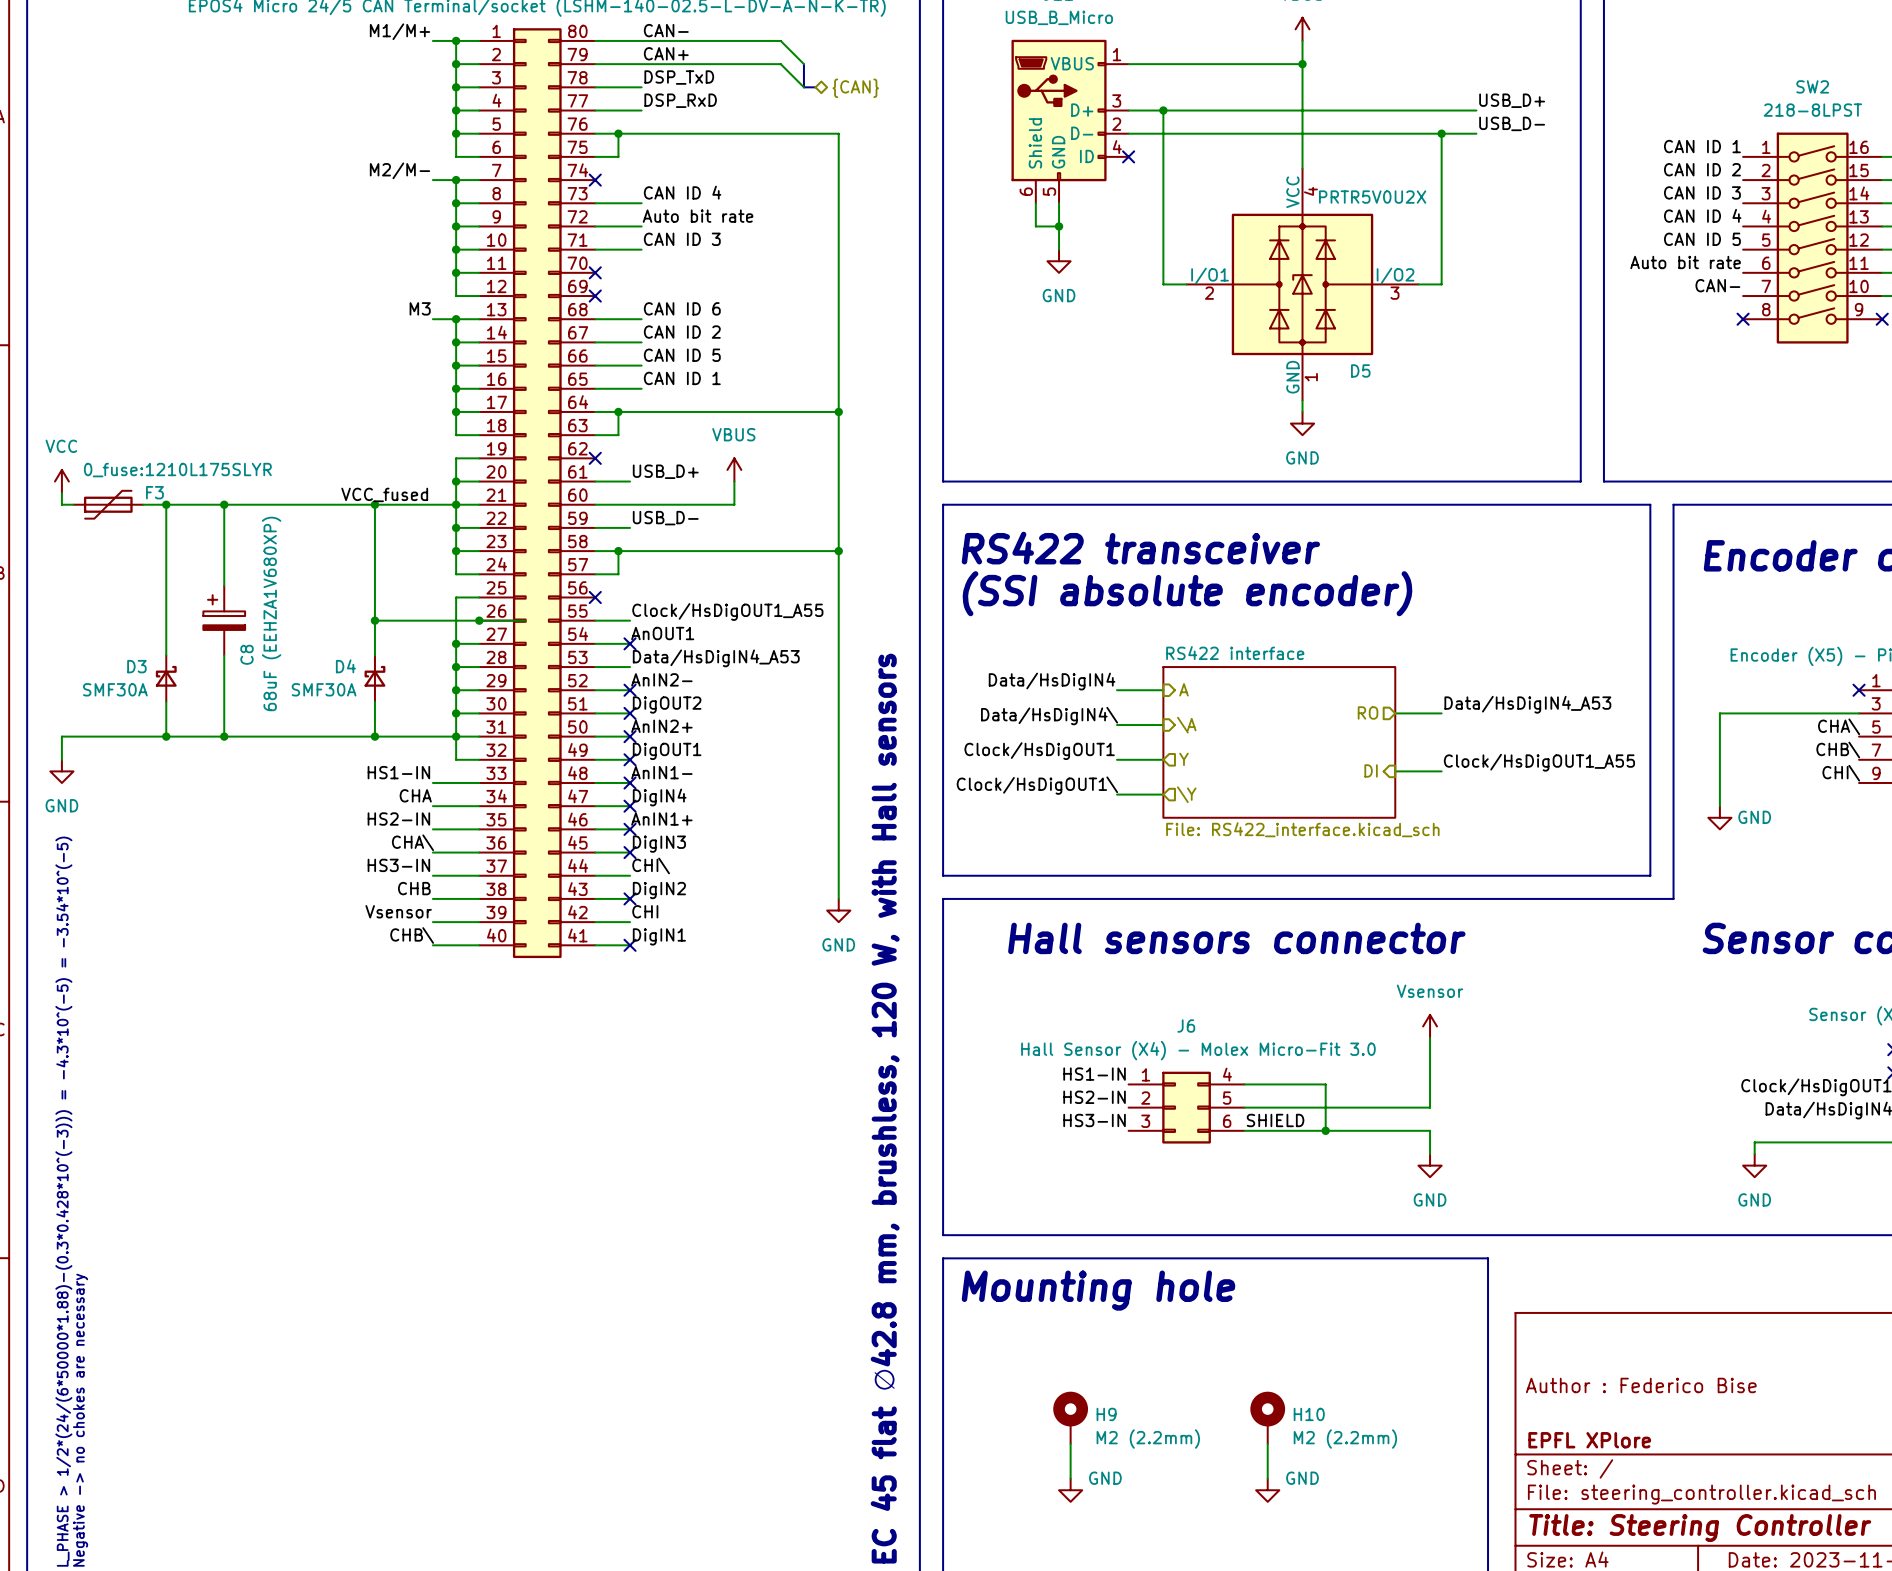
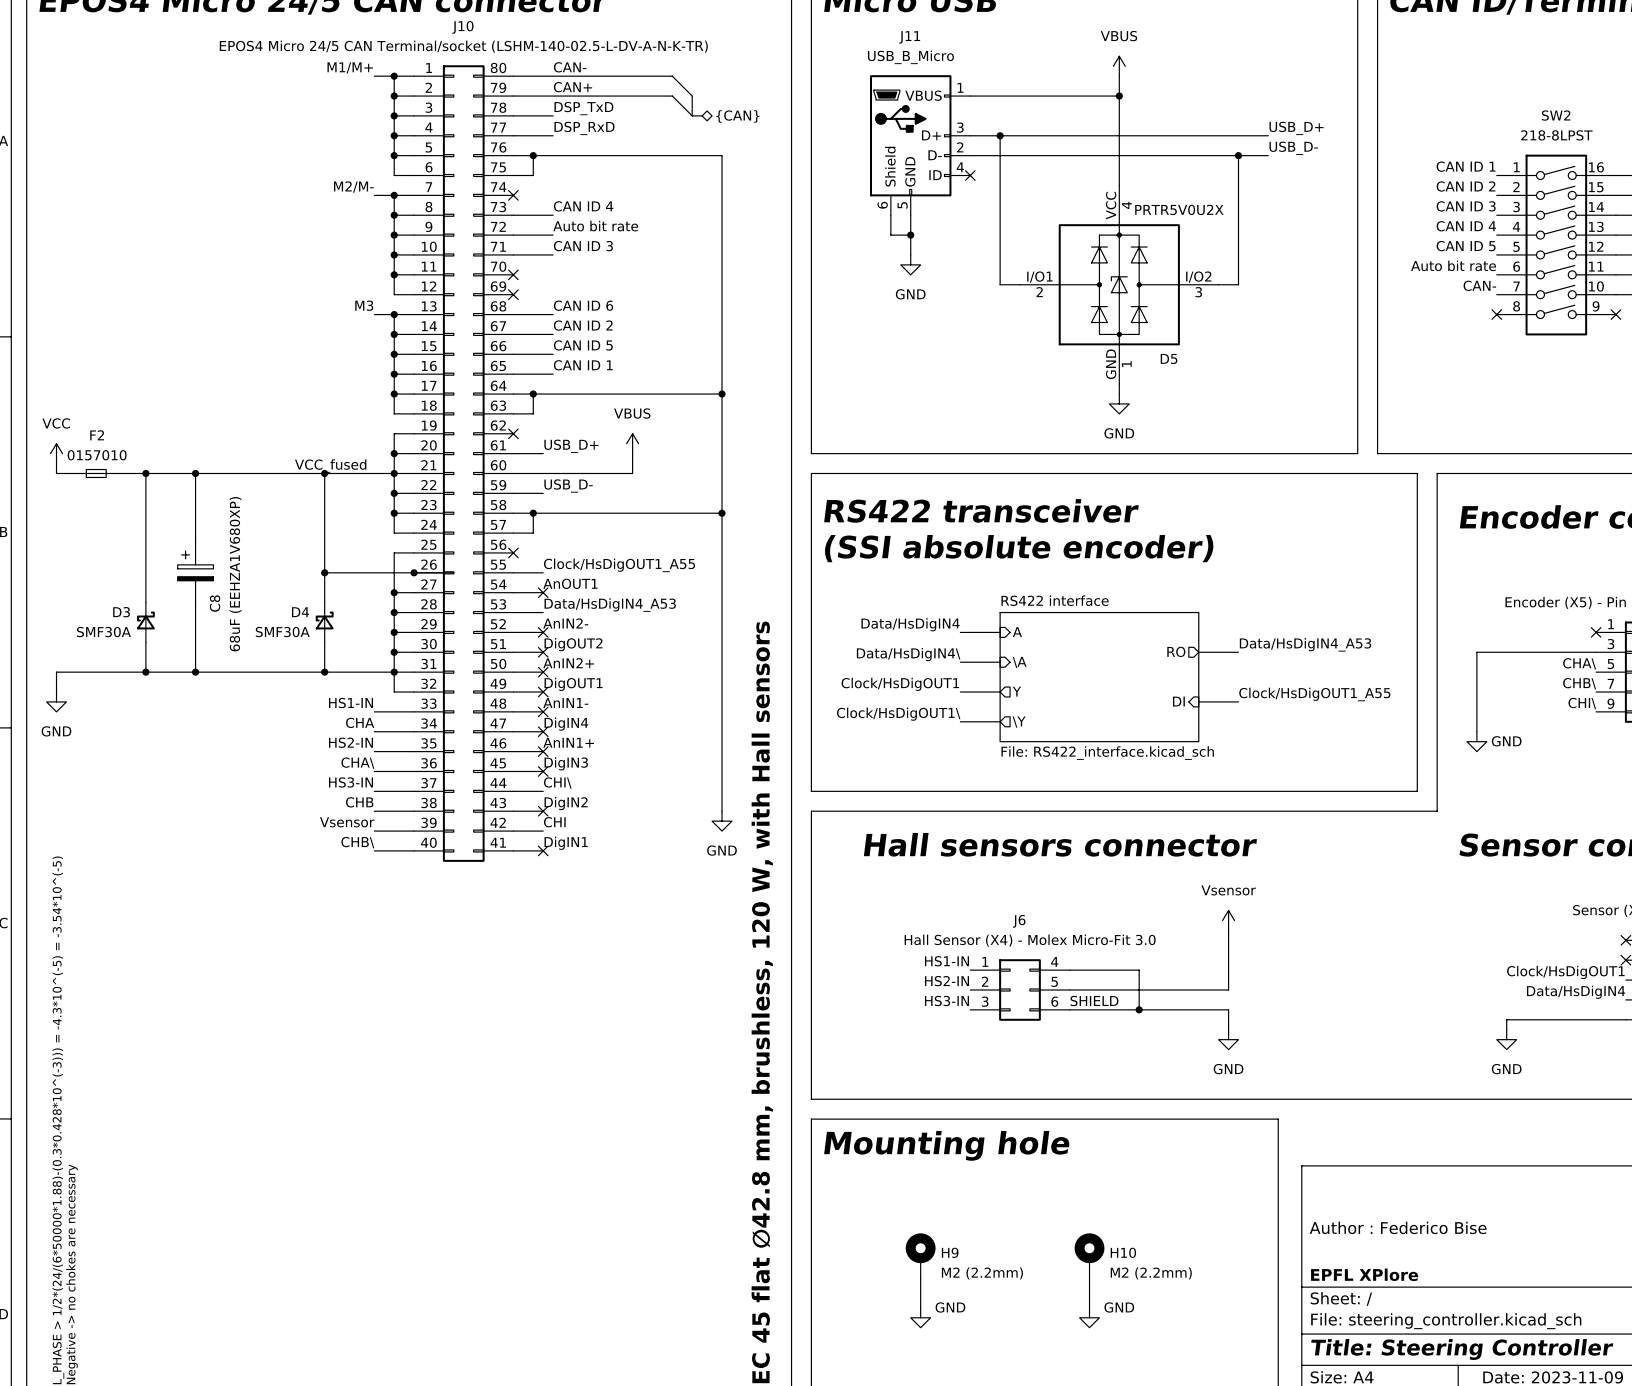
F3: 0_fuse:1210L175SLYR (108, 504) -> none
F2: none -> 0157010 (96, 473)

